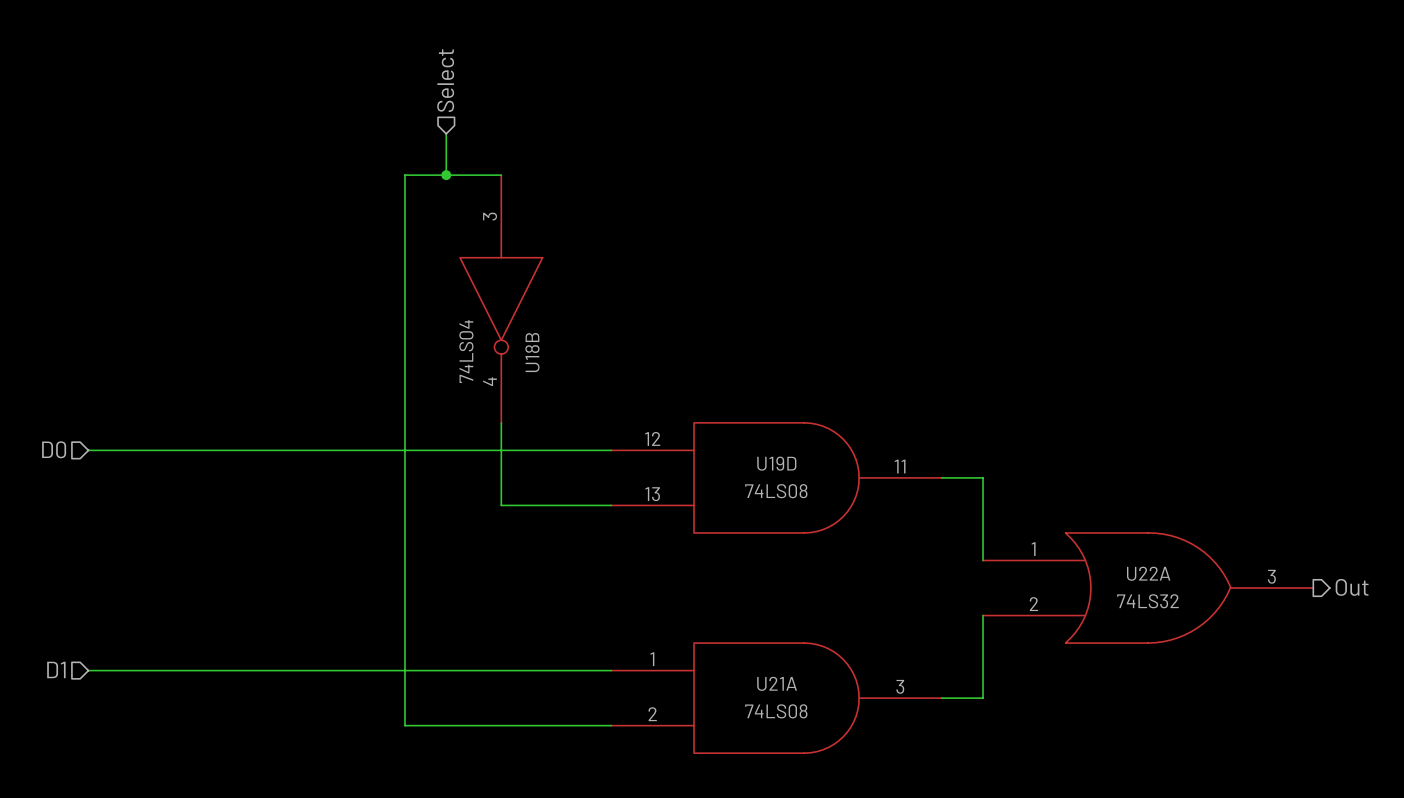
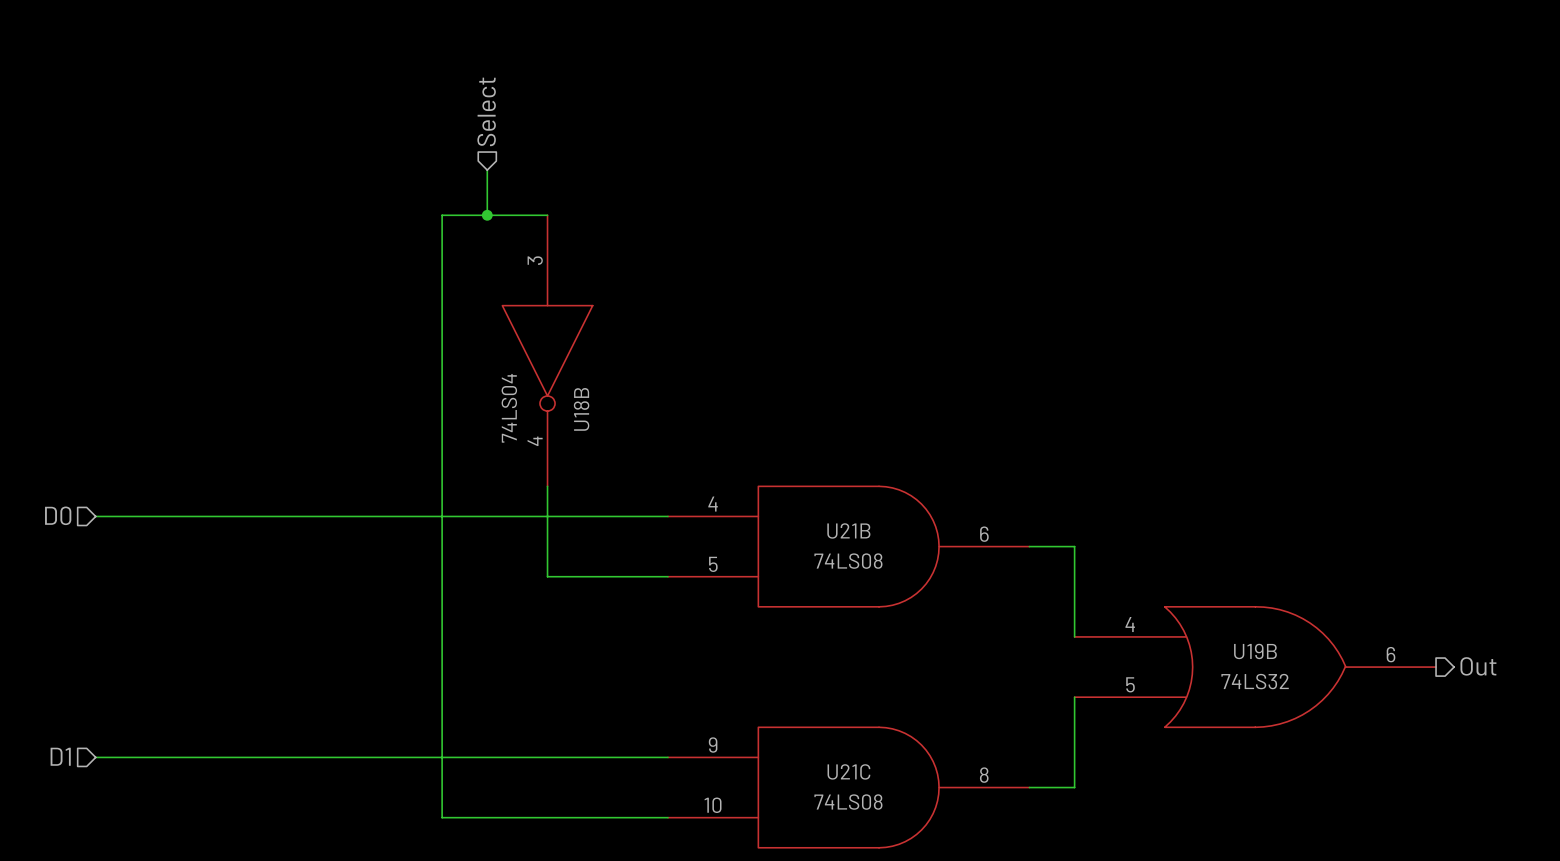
U19D pin number: 12 (652, 438) -> 4 (713, 504)
U19D name: U19D (776, 463) -> U21B (848, 530)
U19D pin number: 11 (900, 466) -> 6 (984, 534)
U19D pin number: 13 (652, 494) -> 5 (713, 564)
U22A pin number: 1 (1033, 549) -> 4 (1130, 624)
U22A name: U22A (1148, 573) -> U19B (1255, 651)
U22A pin number: 3 (1271, 576) -> 6 (1391, 654)
U22A pin number: 2 (1033, 604) -> 5 (1130, 684)
U21A pin number: 1 (652, 659) -> 9 (713, 745)
U21A name: U21A (777, 683) -> U21C (848, 771)
U21A pin number: 3 (900, 686) -> 8 (984, 775)
U21A pin number: 2 (652, 714) -> 10 (713, 805)

